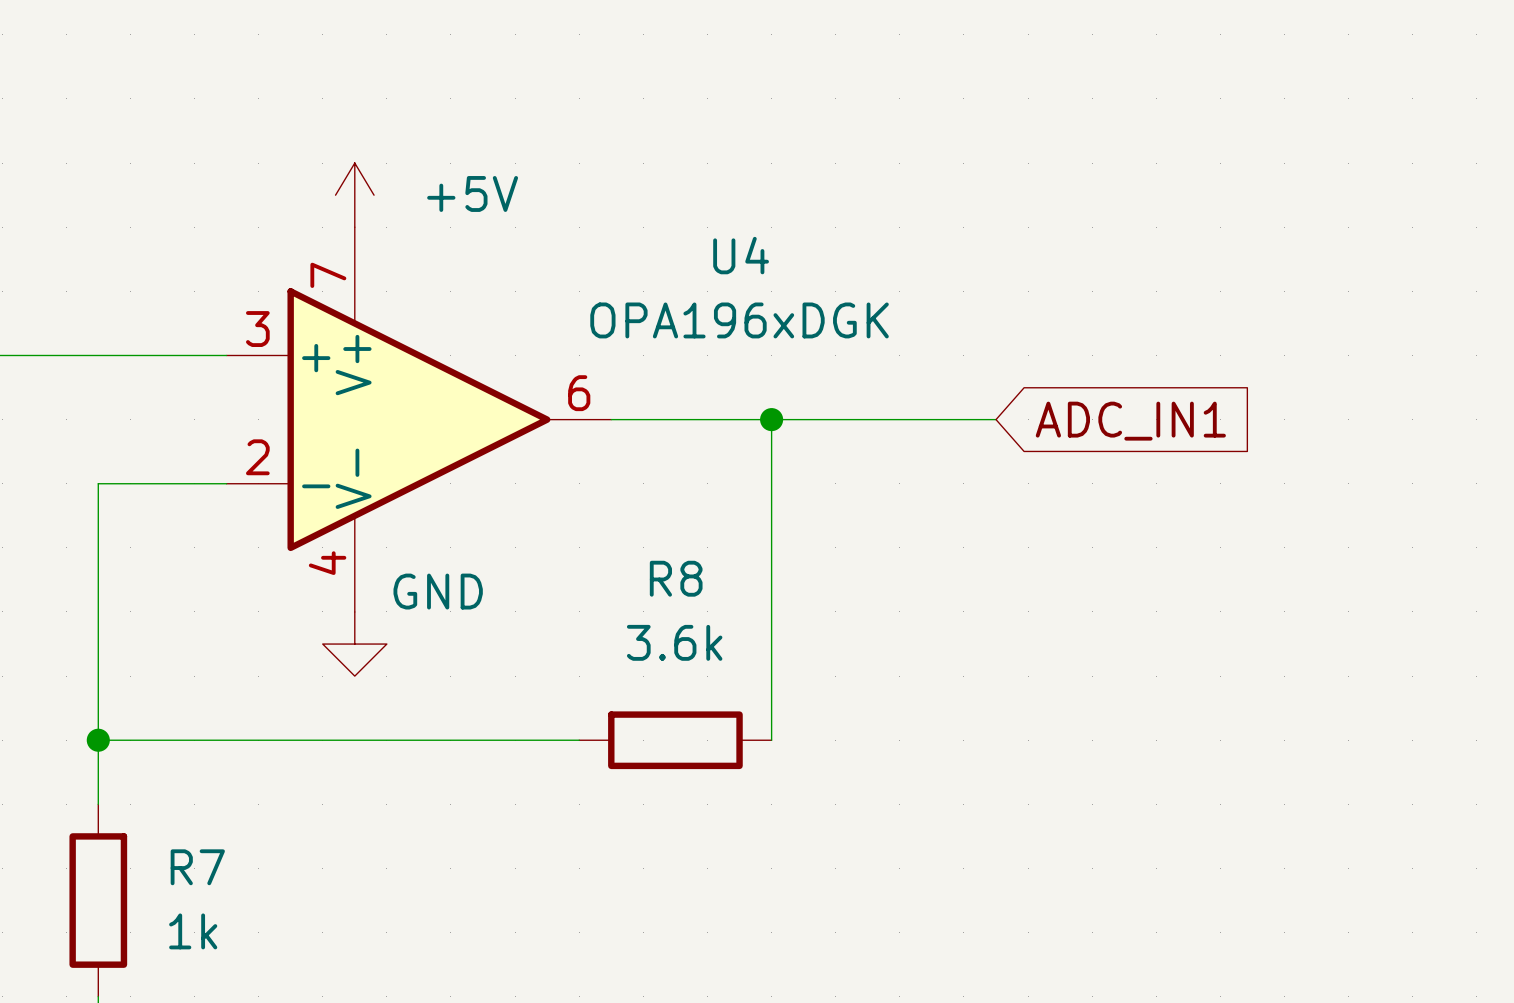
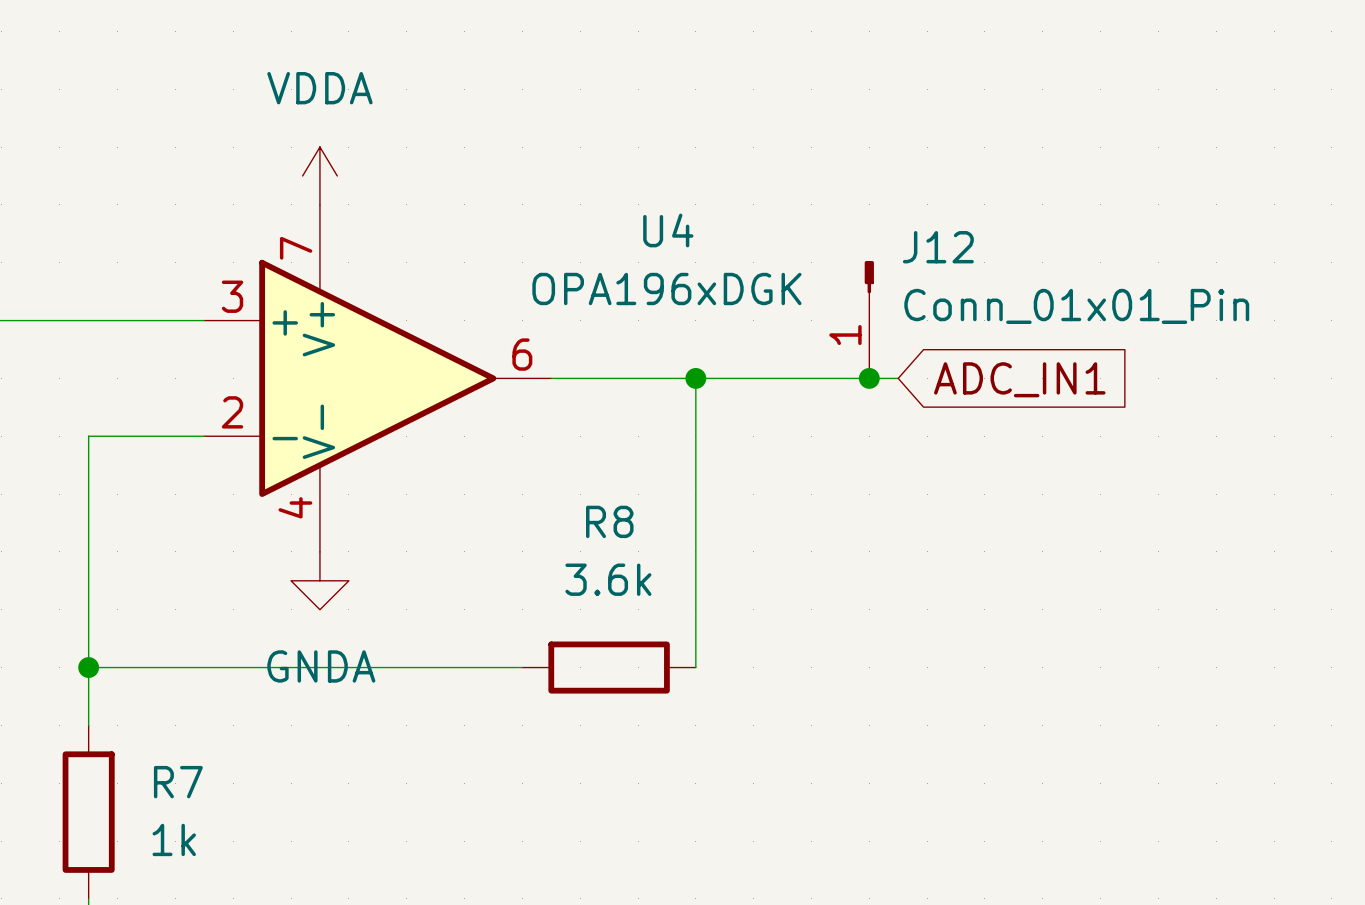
power symbol: +5V (354, 195) -> VDDA (319, 176)
J12: none -> Conn_01x01_Pin (869, 319)
junction: none -> (869, 378)
power symbol: GND (354, 644) -> GNDA (319, 580)

